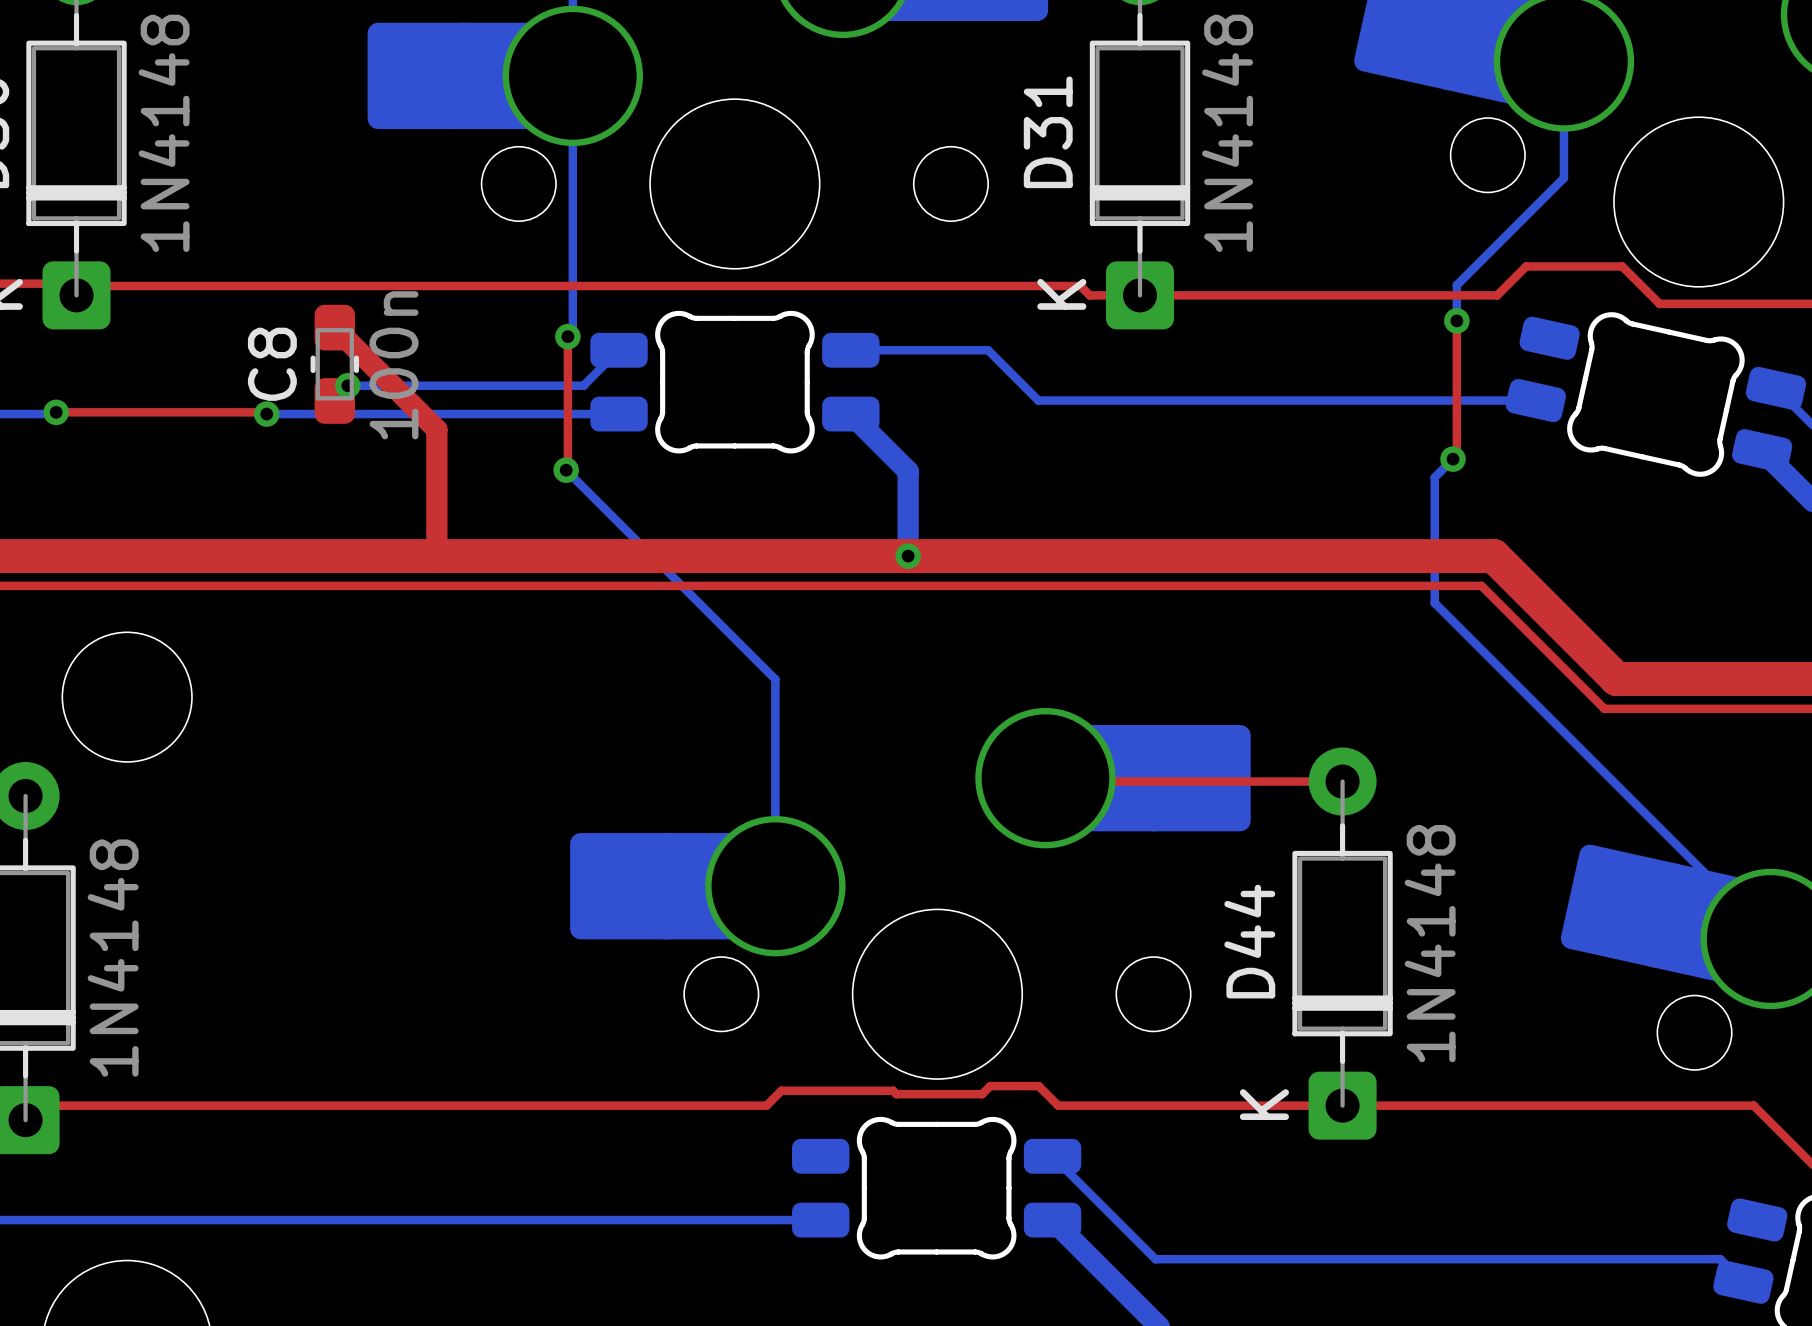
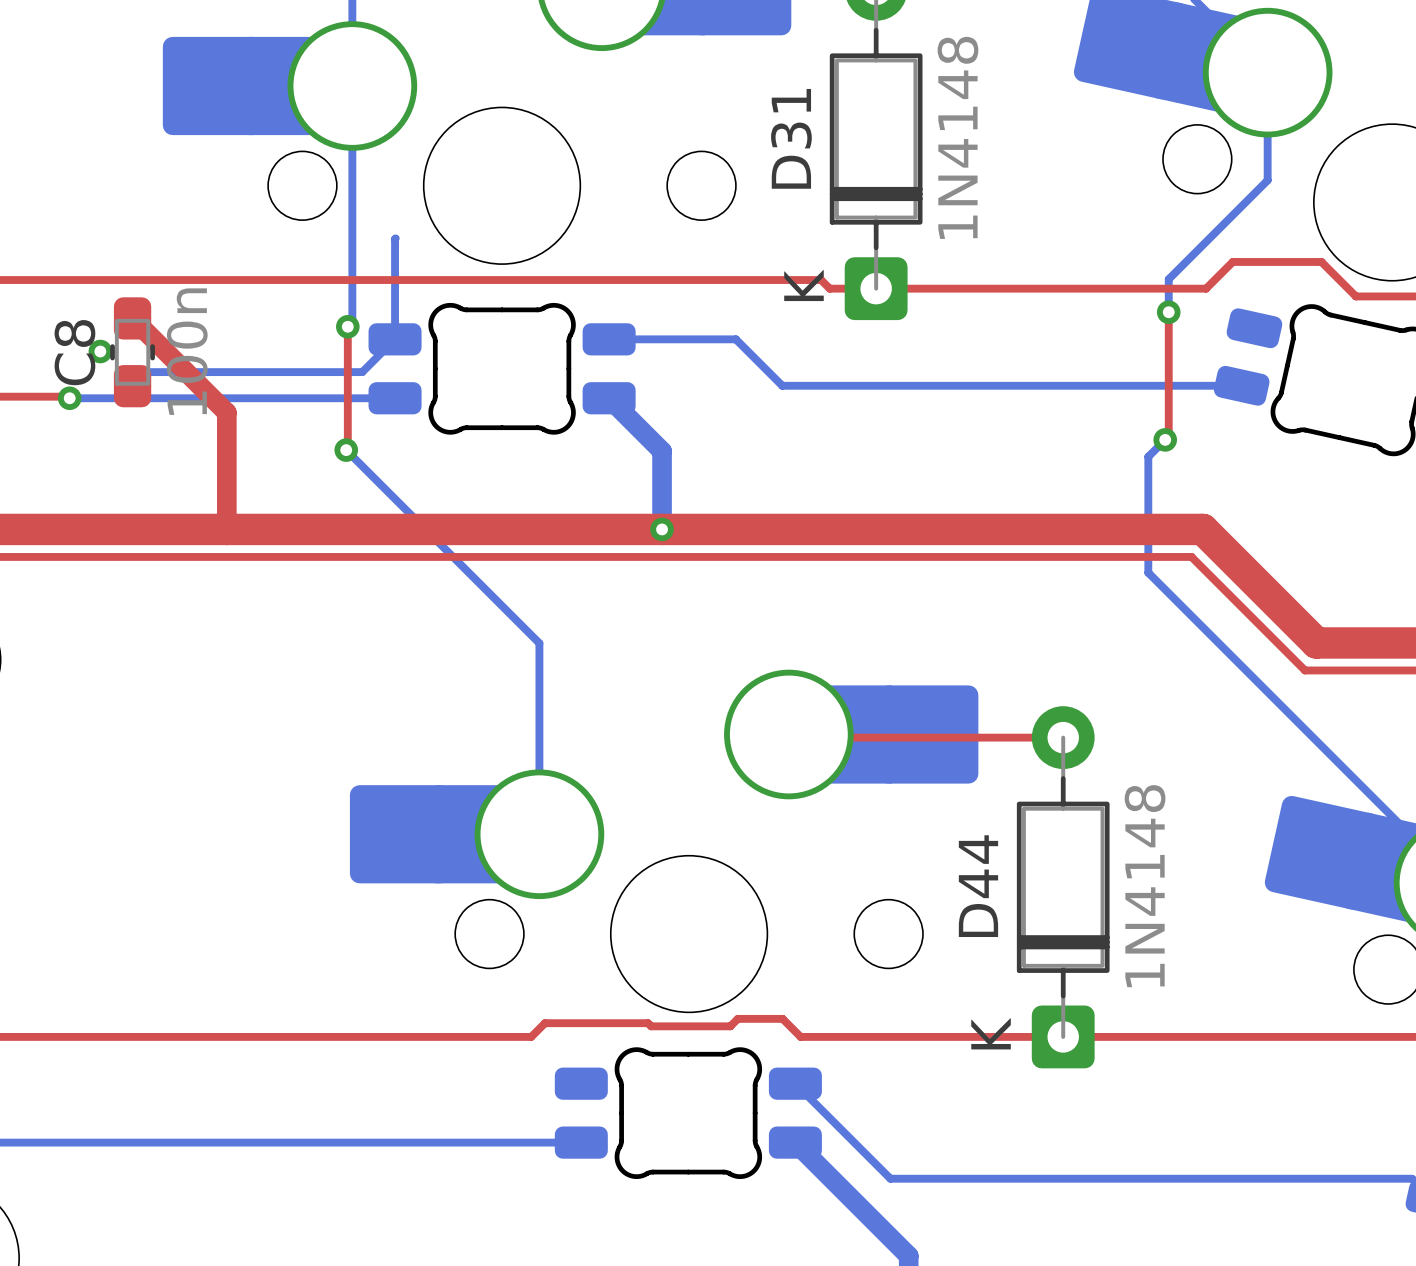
bottom track: none -> (395, 238) (395, 339)
via position: (347, 385) -> (100, 351)

